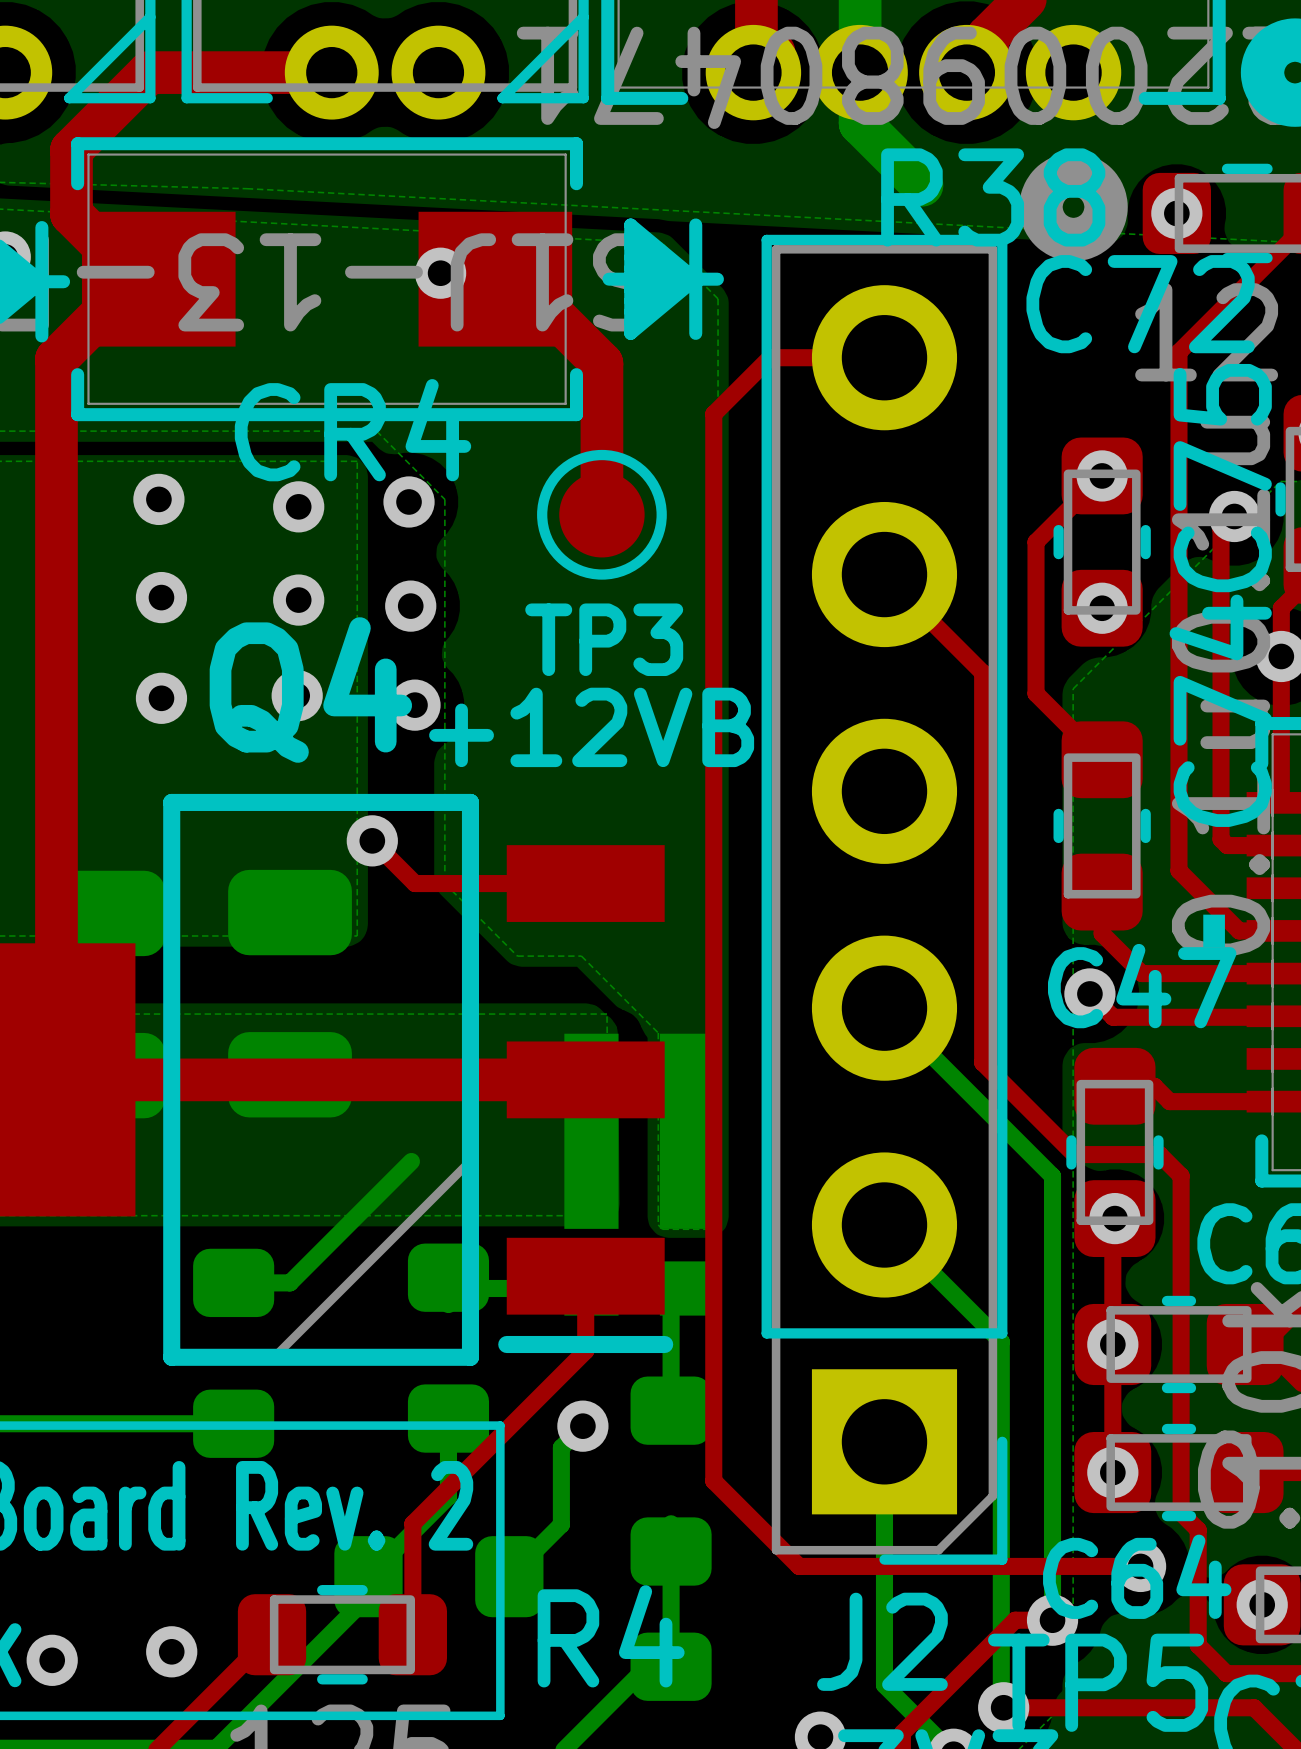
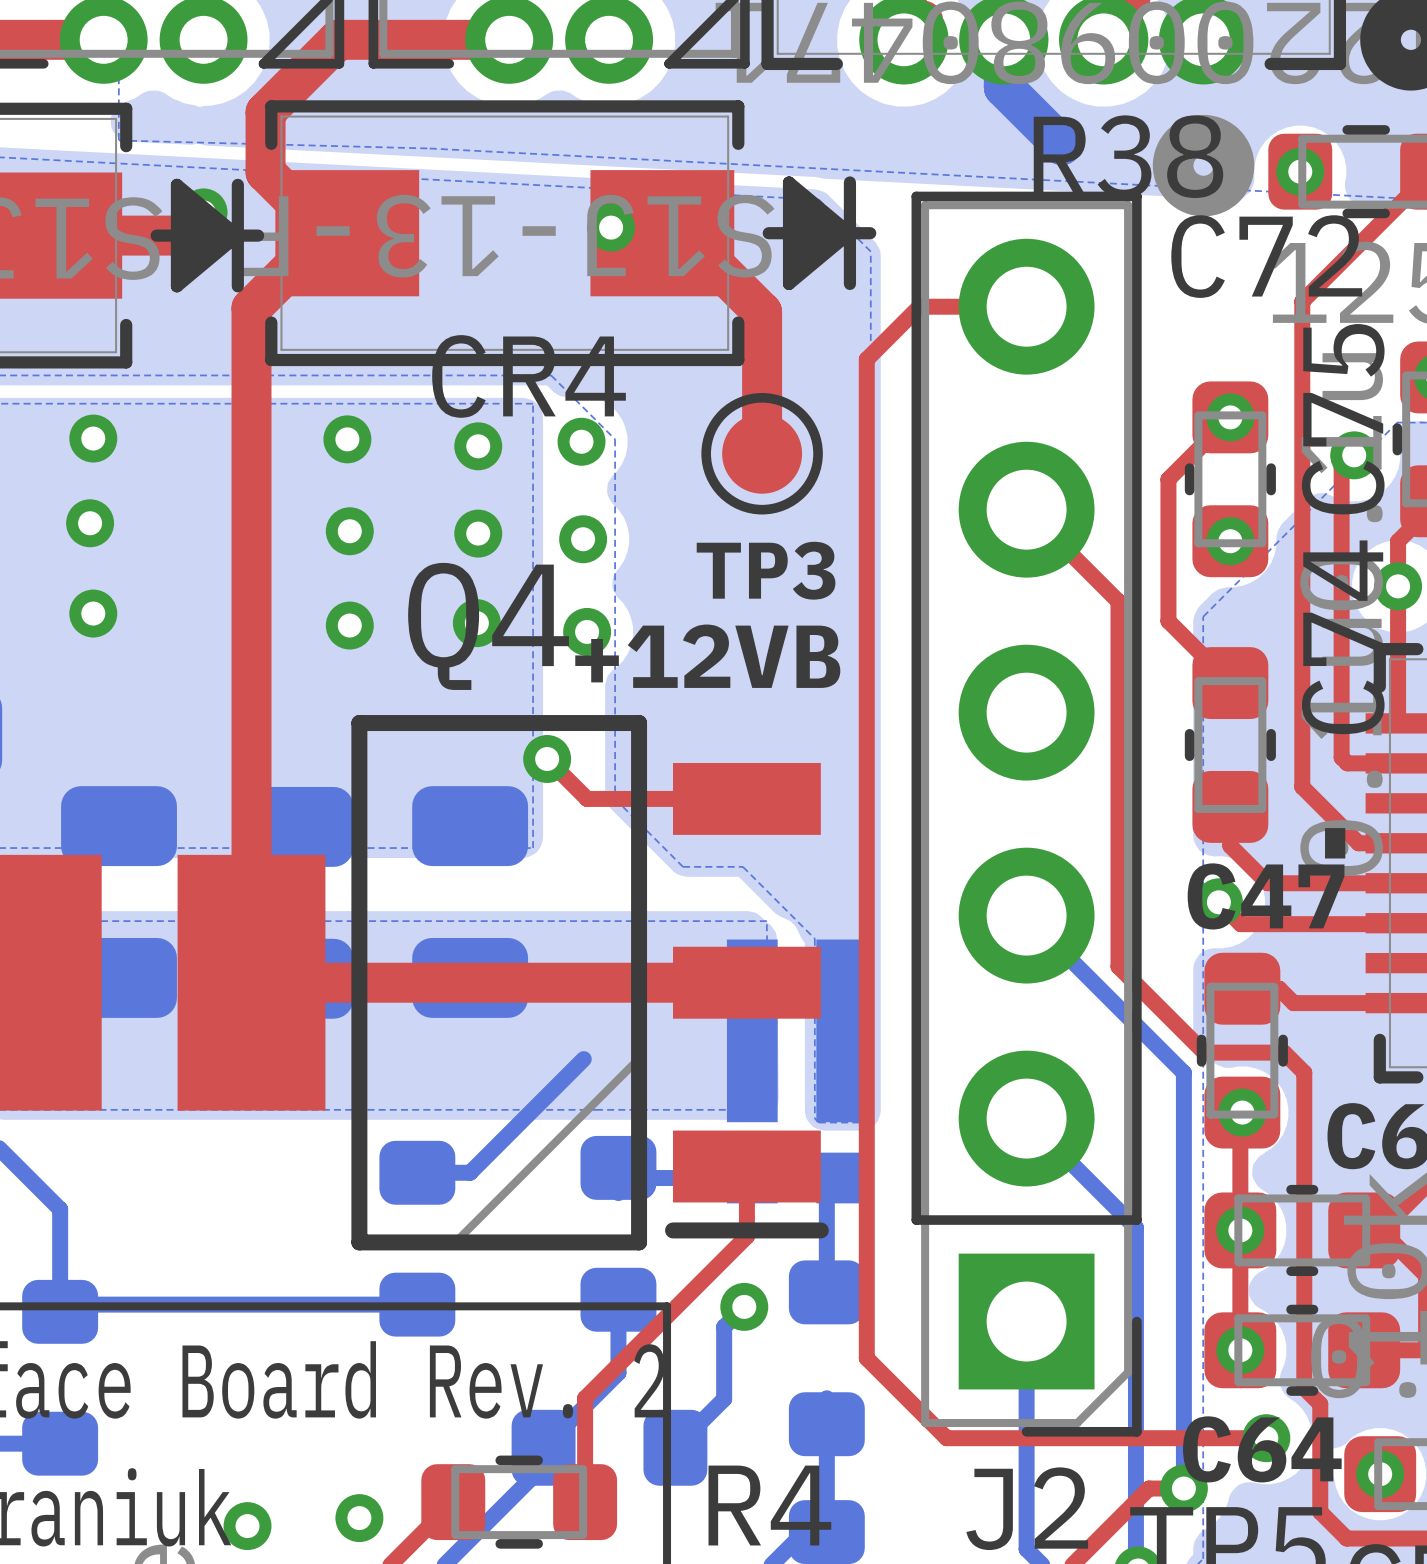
text position: +12VB (591, 727) -> +12VB (707, 656)

